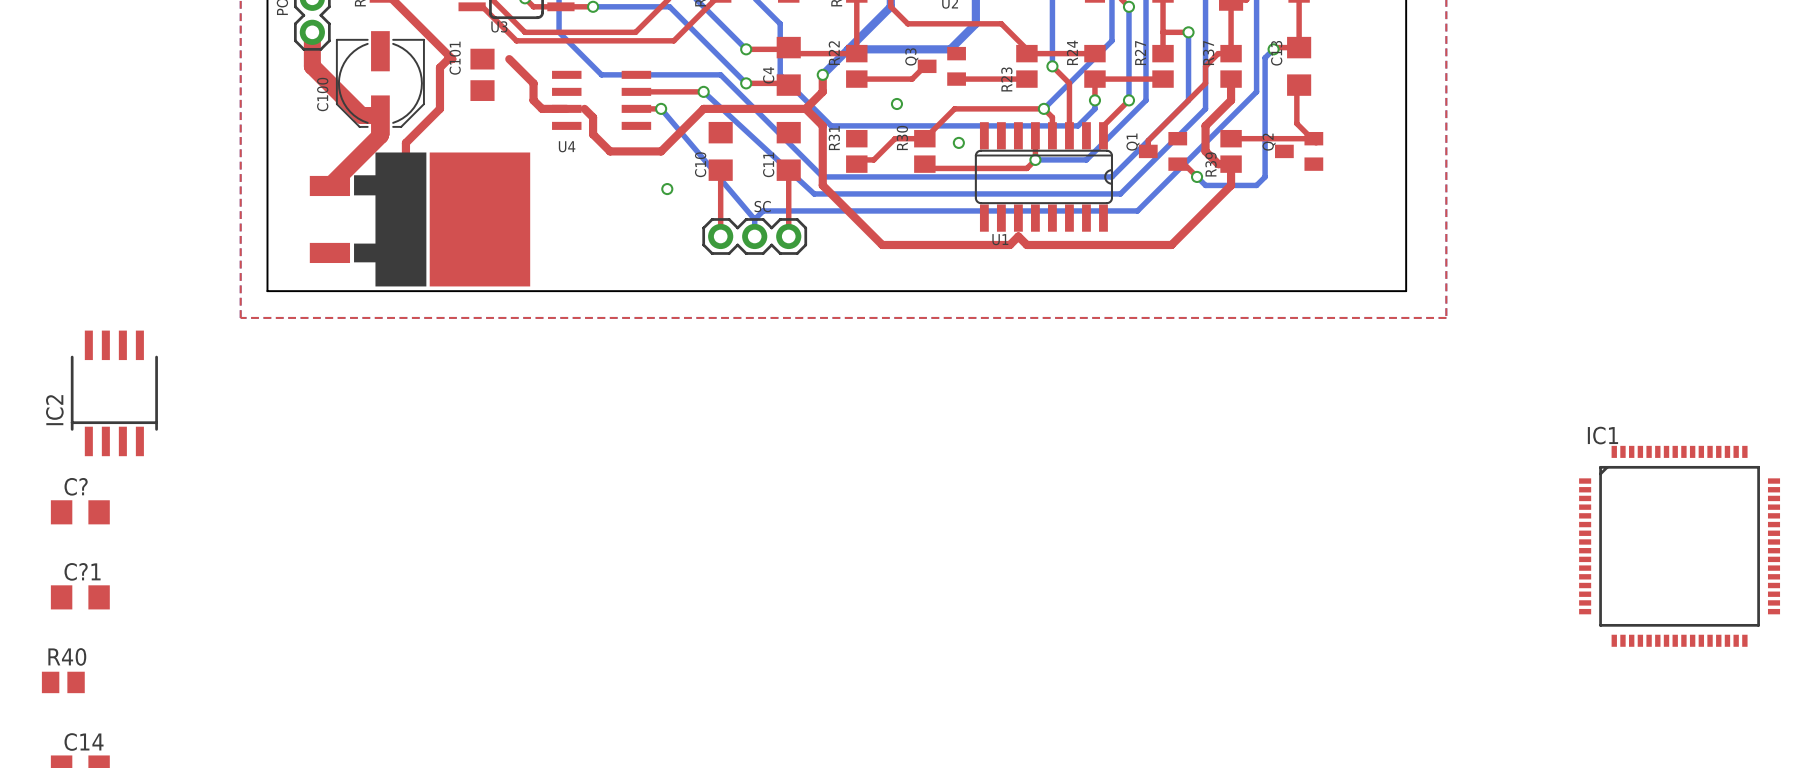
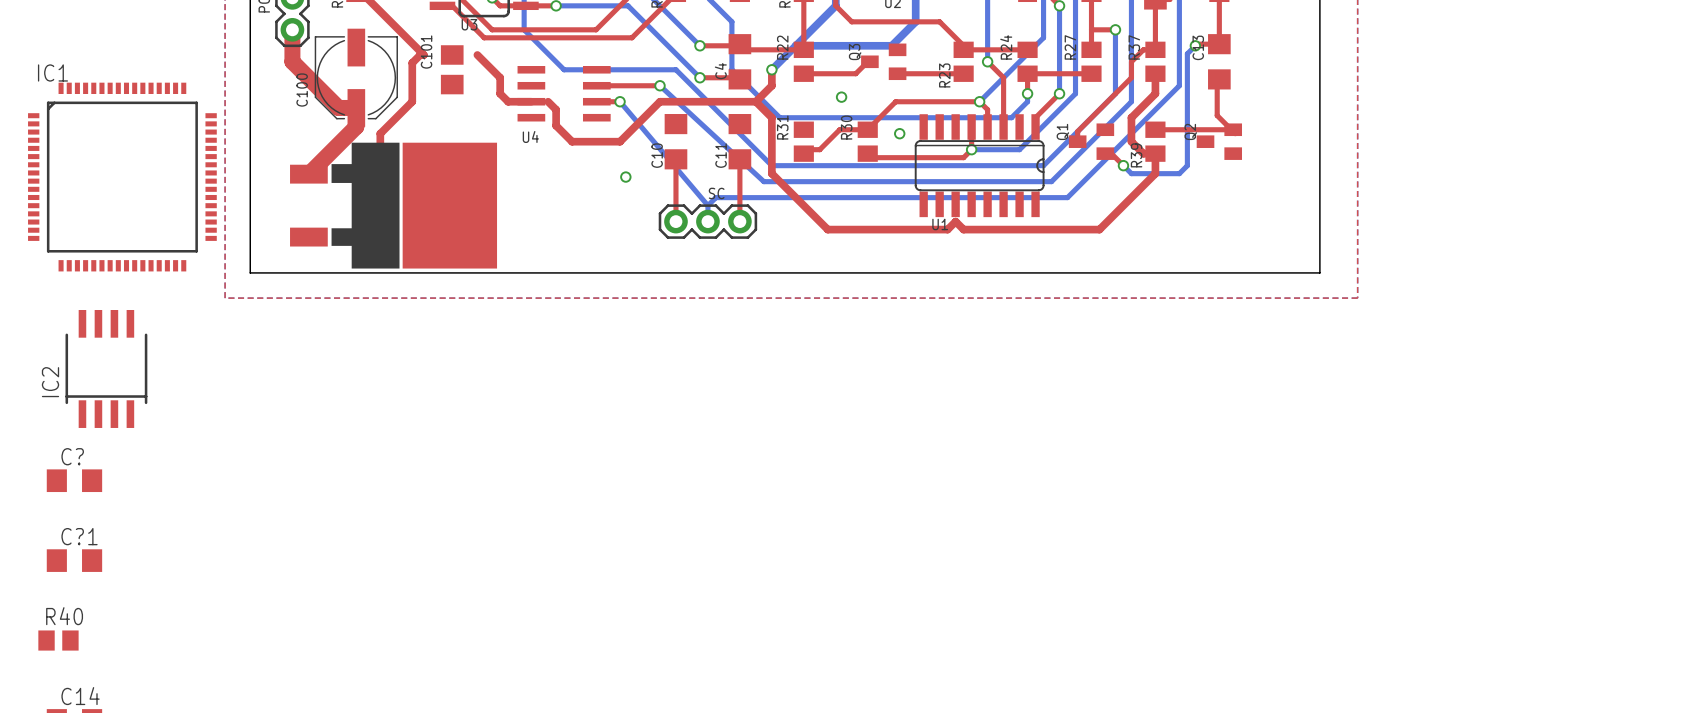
IC1 position: (1679, 546) -> (122, 177)

